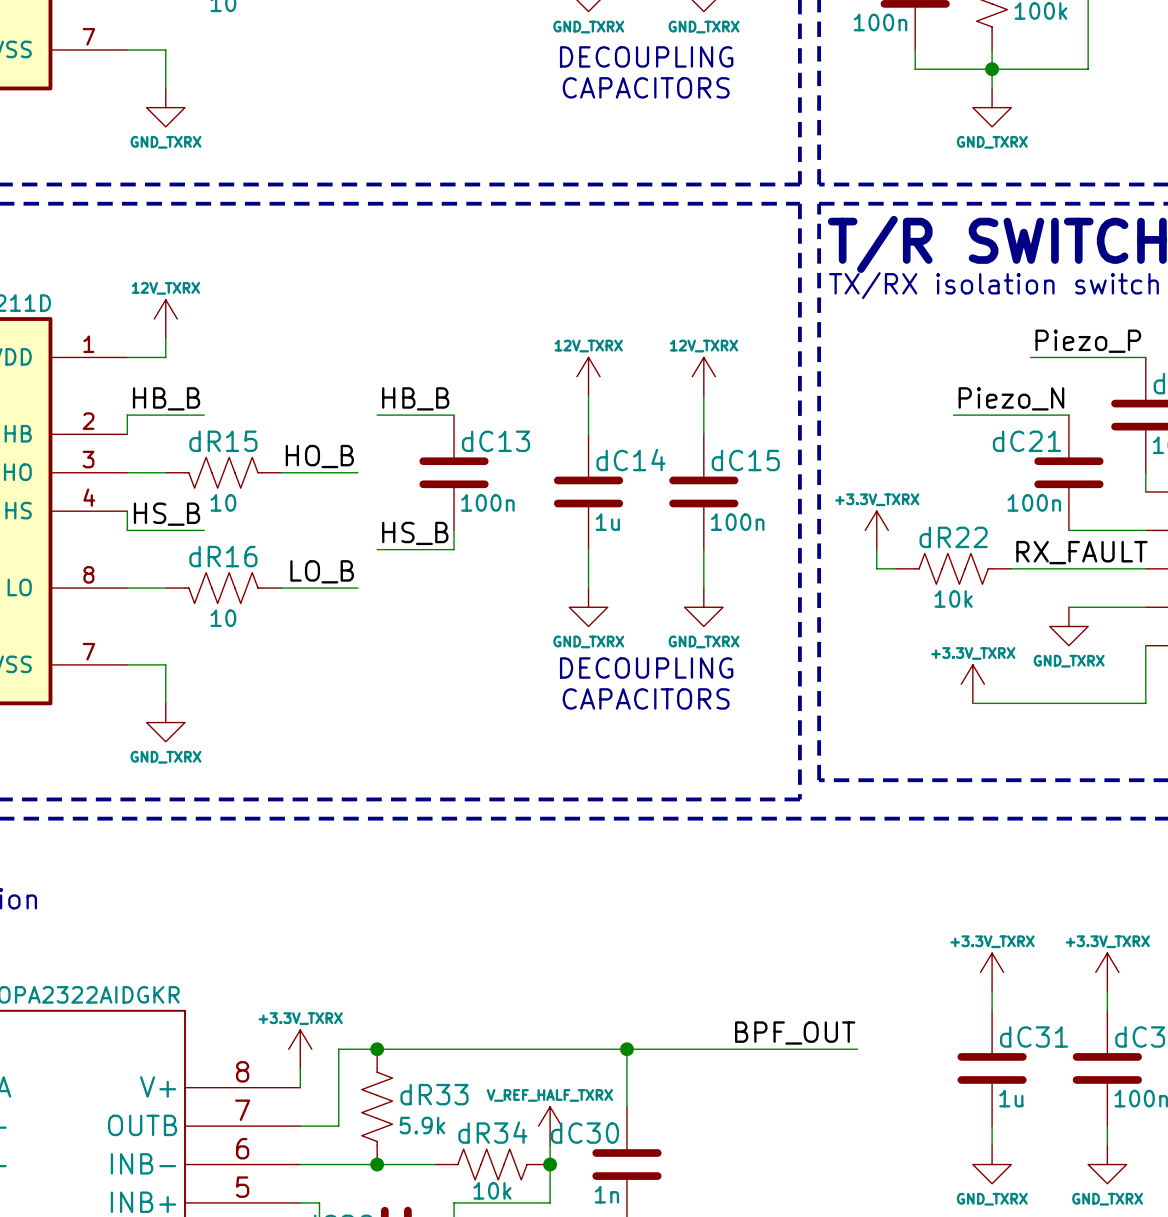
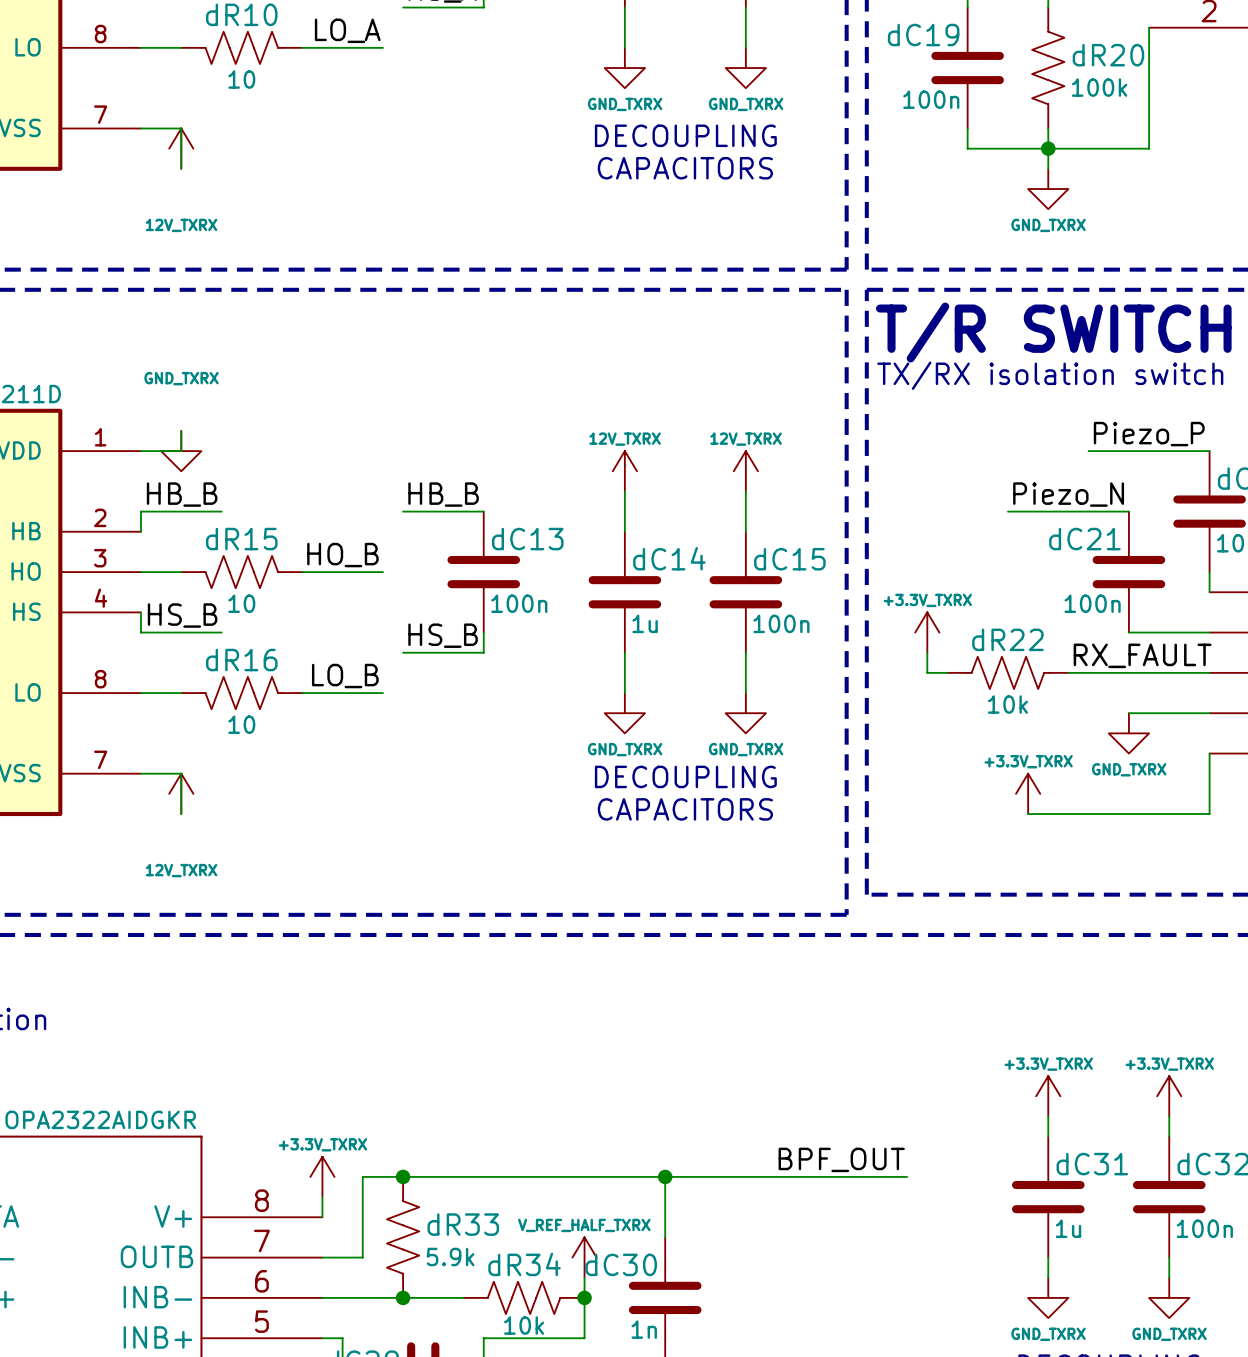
power symbol: none -> 12V_TXRX (181, 148)
power symbol: GND_TXRX (165, 107) -> none
power symbol: 12V_TXRX (165, 319) -> none
power symbol: none -> GND_TXRX (181, 451)
power symbol: none -> 12V_TXRX (181, 793)
power symbol: GND_TXRX (165, 722) -> none

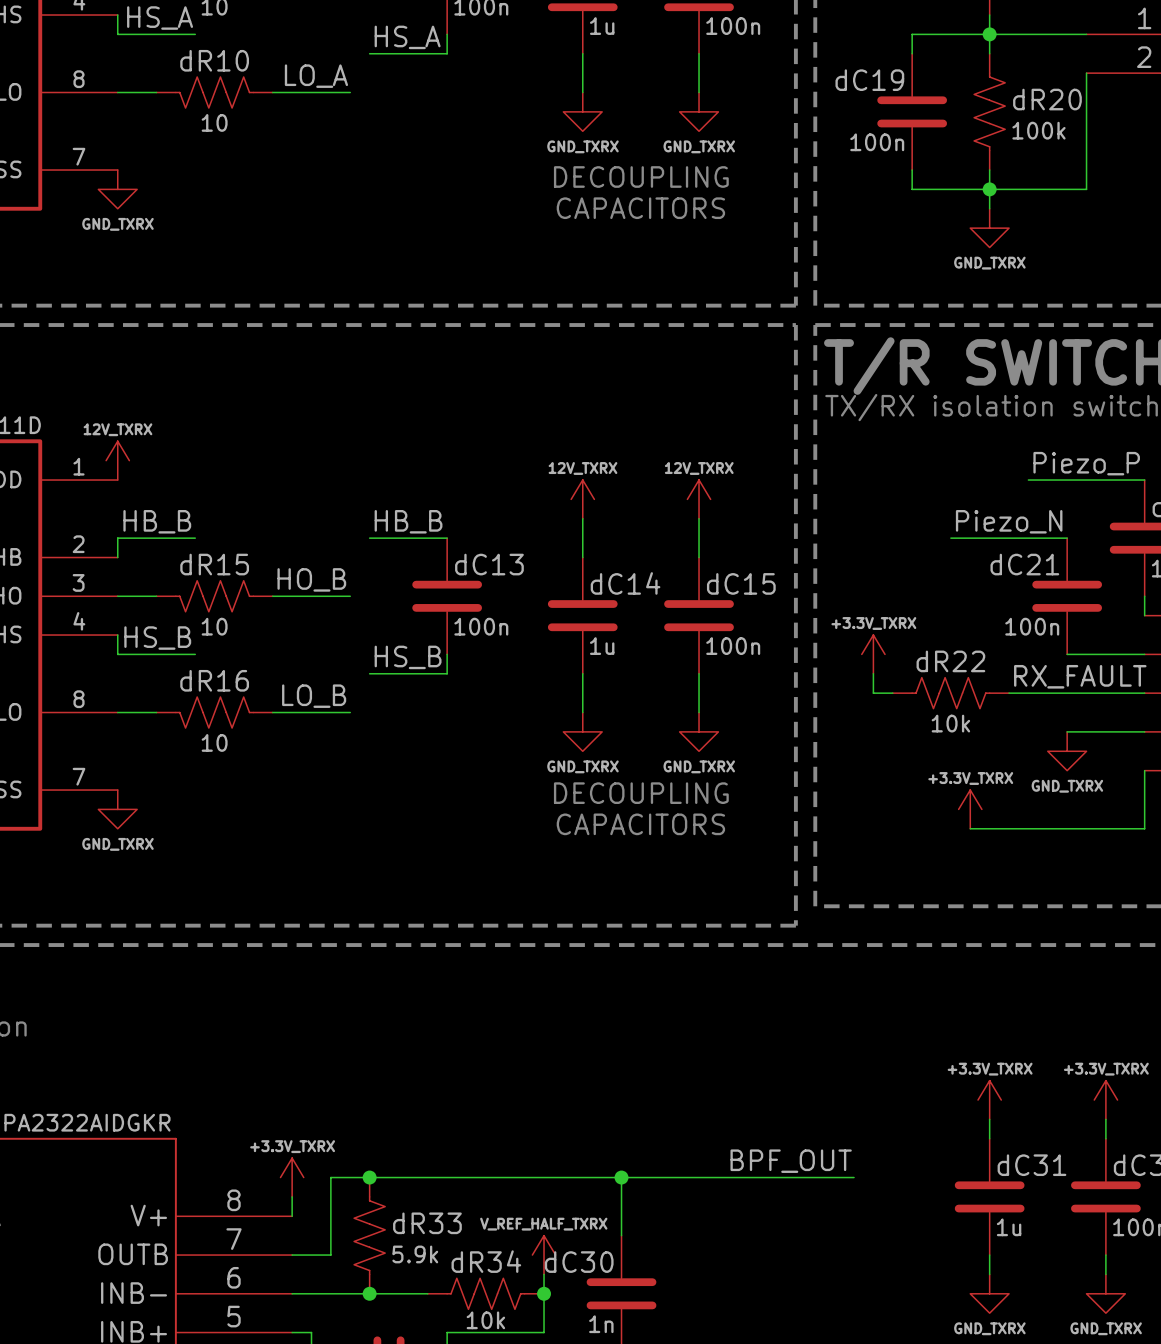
wire: (140, 128) (181, 128) (181, 168) -> none
power symbol: none -> GND_TXRX (117, 189)
power symbol: 12V_TXRX (181, 148) -> none
power symbol: none -> 12V_TXRX (117, 460)
wire: (181, 430) (181, 451) (140, 451) -> none
power symbol: GND_TXRX (181, 451) -> none
wire: (140, 773) (181, 773) (181, 814) -> none
power symbol: none -> GND_TXRX (117, 809)
power symbol: 12V_TXRX (181, 793) -> none

